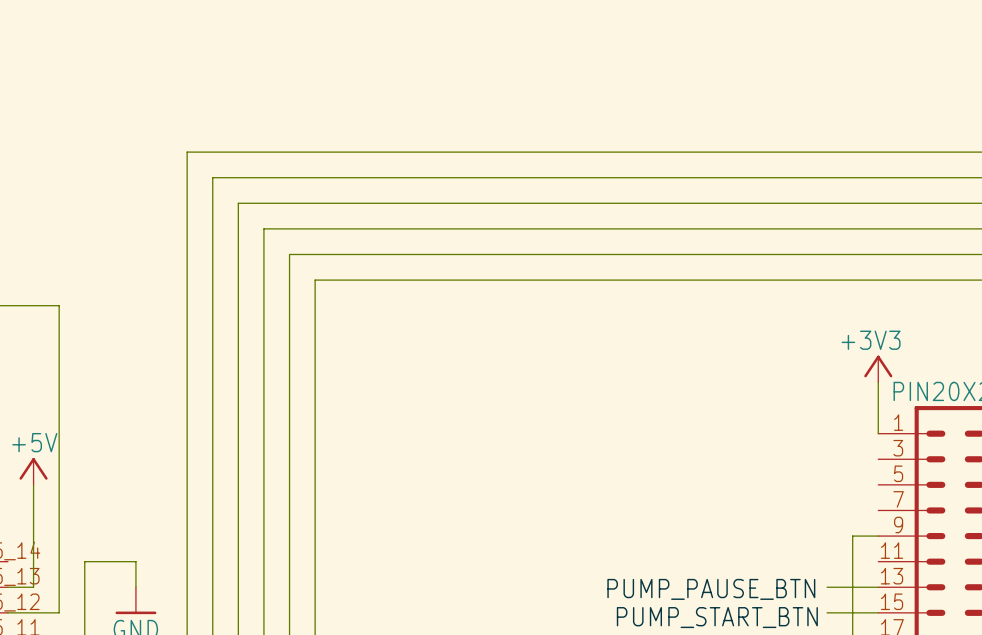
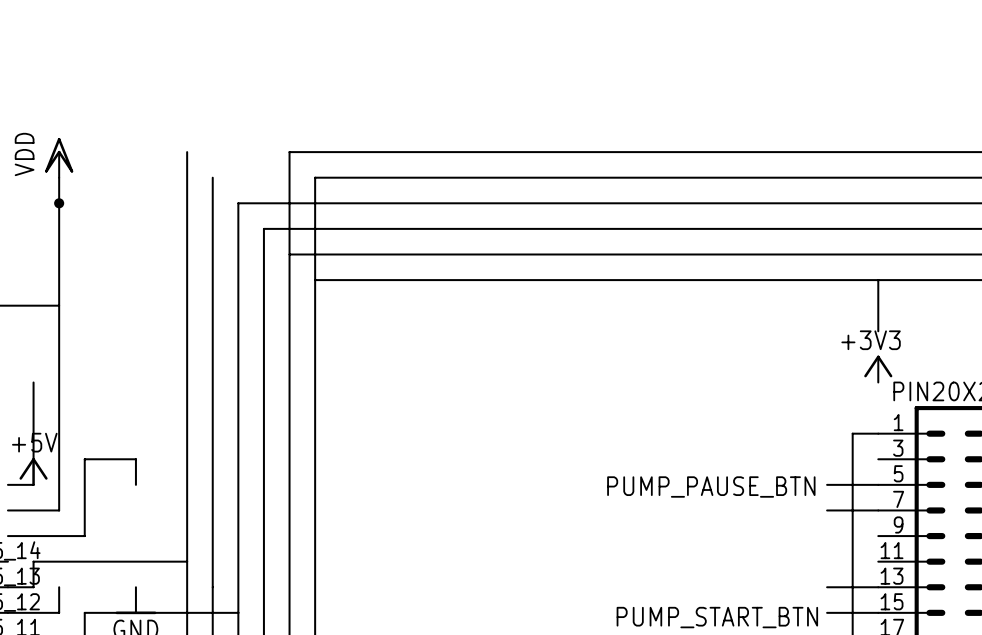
wire: (187, 152) (289, 152) -> (289, 254) (289, 152)
power symbol: none -> VDD (59, 157)
wire: none -> (59, 177) (59, 305)
wire: (212, 177) (315, 177) -> (315, 280) (315, 177)
junction: none -> (59, 203)
wire: none -> (33, 382) (33, 484) (7, 484)
wire: (878, 382) (878, 433) -> (878, 280) (878, 331)
wire: (33, 484) (33, 561) -> none
wire: none -> (135, 484) (135, 459) (84, 459) (84, 536) (7, 536)
wire: none -> (827, 484) (878, 484)
wire: (59, 510) (59, 587) -> (59, 510) (7, 510)
wire: none -> (827, 510) (878, 510)
wire: (852, 536) (878, 536) -> (852, 536) (852, 433) (878, 433)
wire: (84, 561) (84, 612) -> (84, 561) (33, 561)
wire: (135, 561) (135, 587) -> (135, 561) (187, 561)
label position: PUMP_PAUSE_BTN (711, 589) -> PUMP_PAUSE_BTN (711, 487)
wire: none -> (84, 612) (238, 612)

